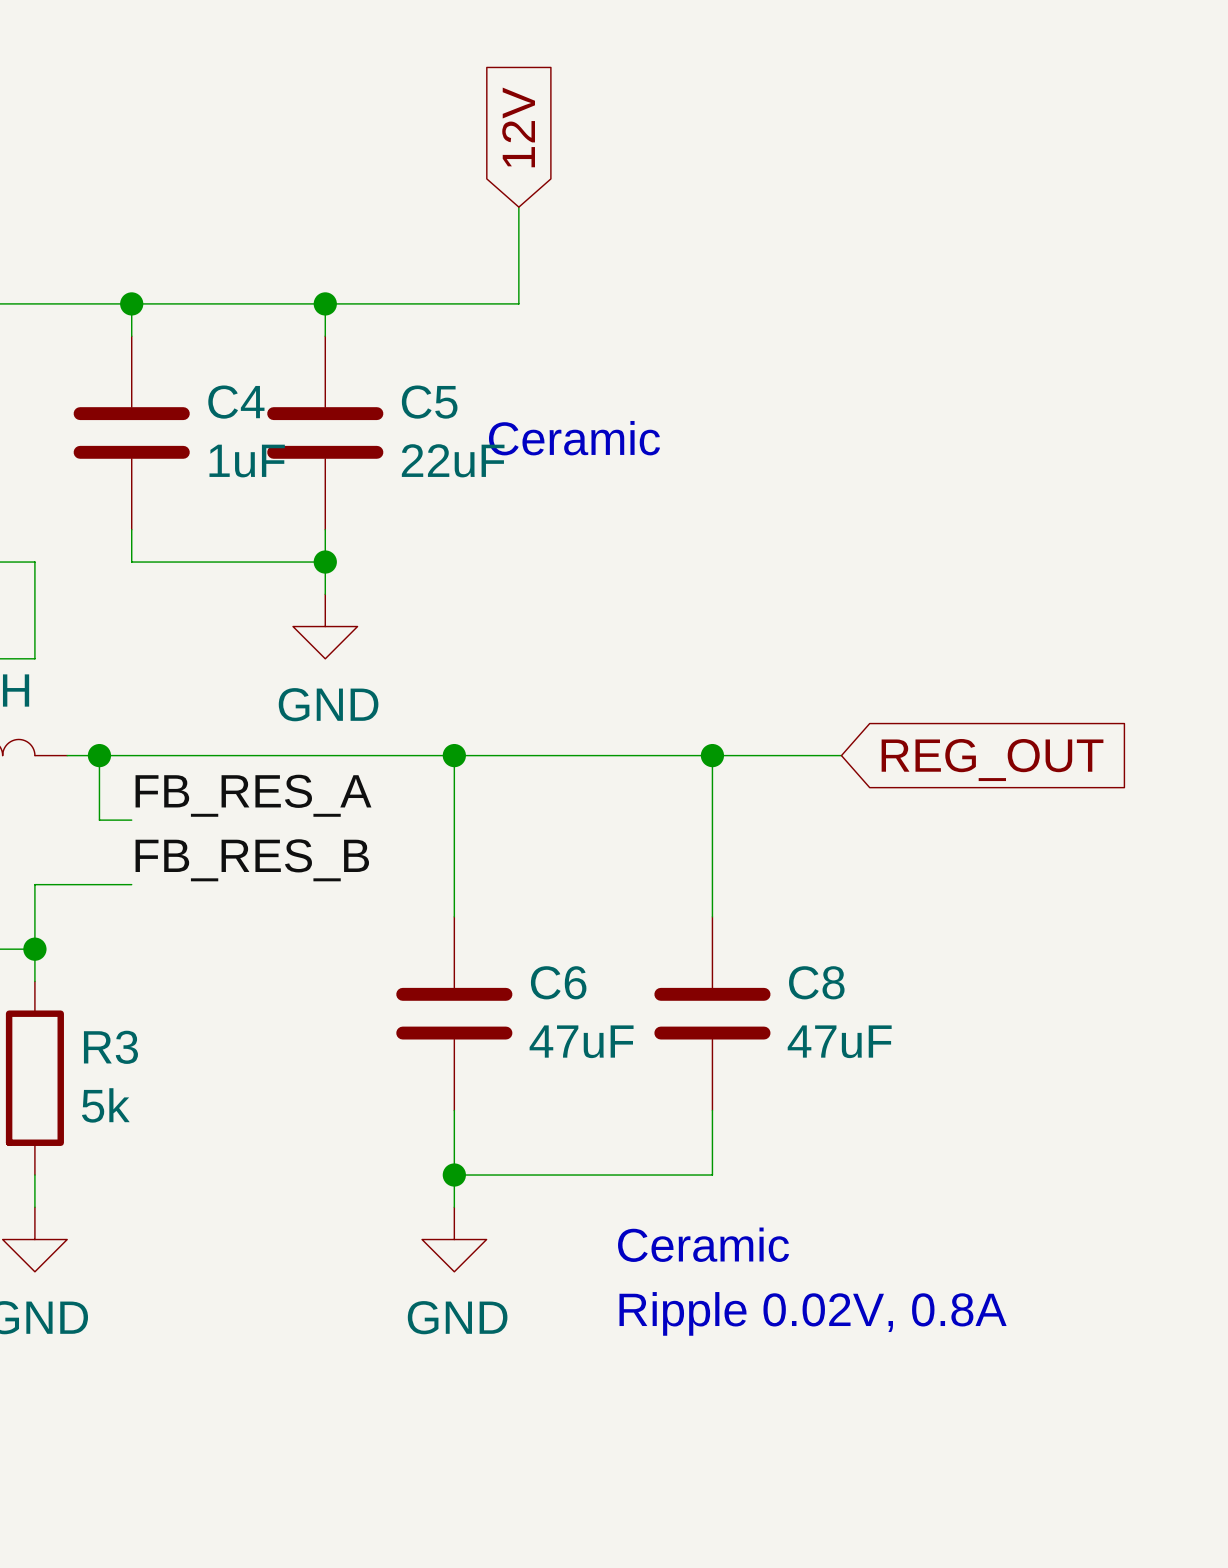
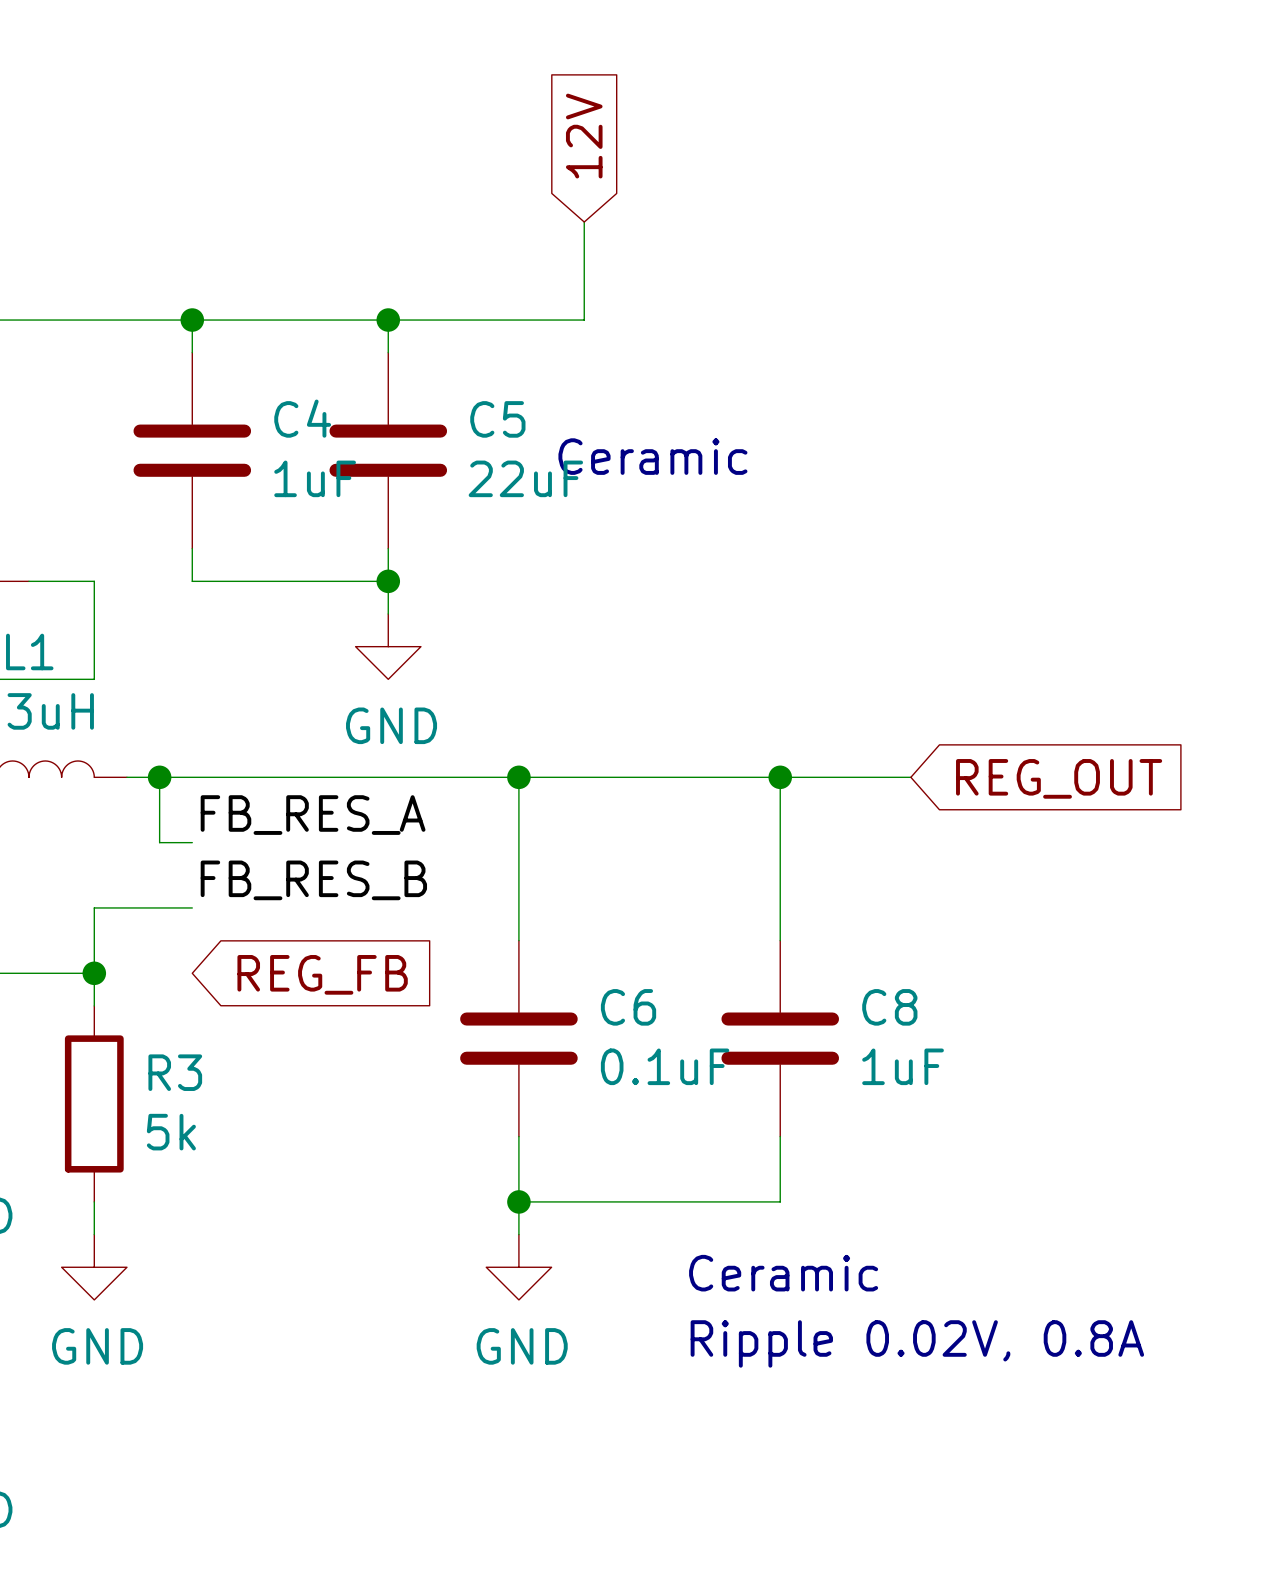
global label: none -> REG_FB (322, 974)
C6 value: 47uF (581, 1041) -> 0.1uF (665, 1066)
C8 value: 47uF (839, 1041) -> 1uF (903, 1066)

